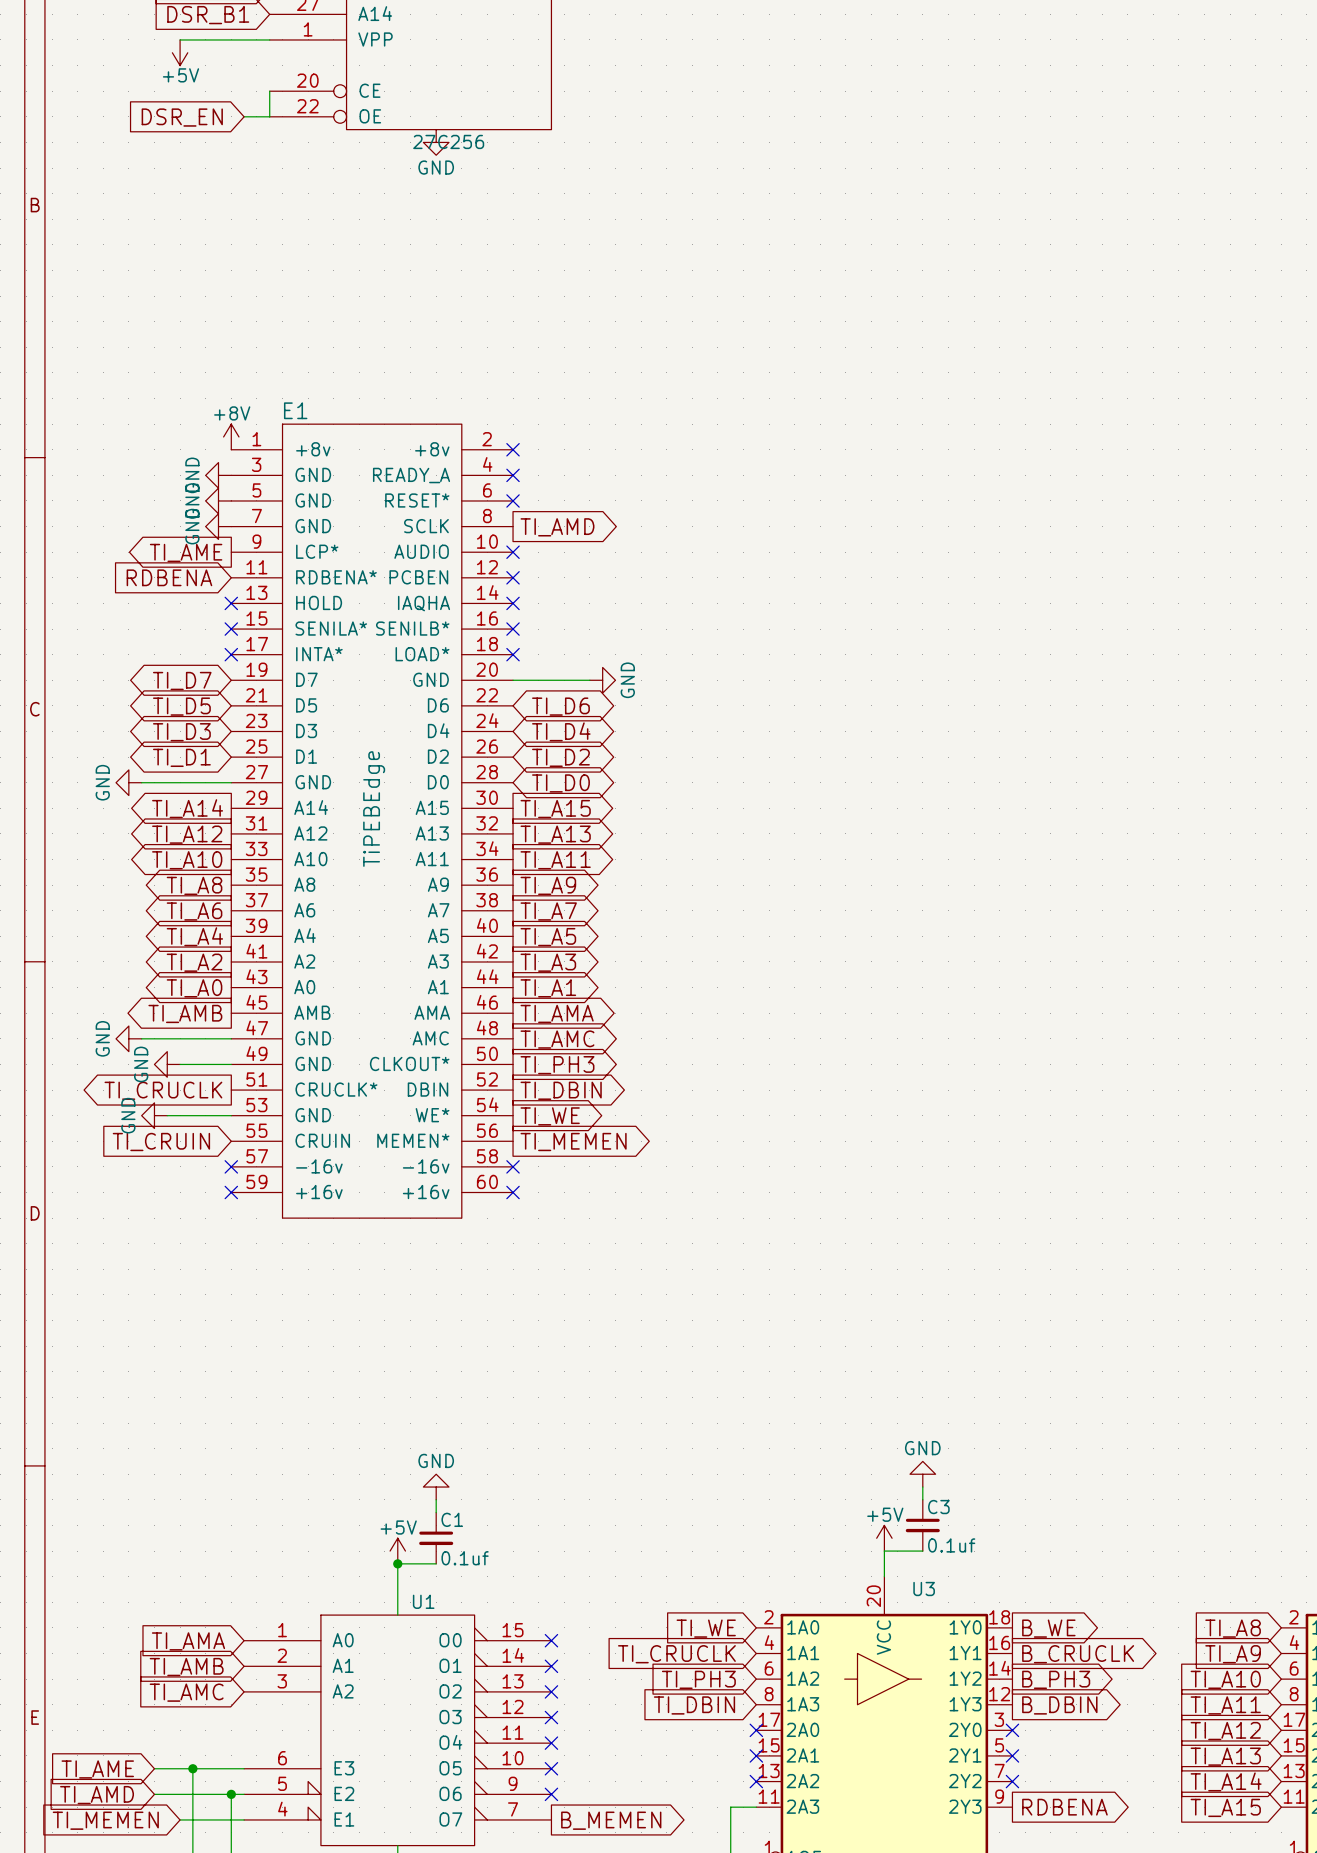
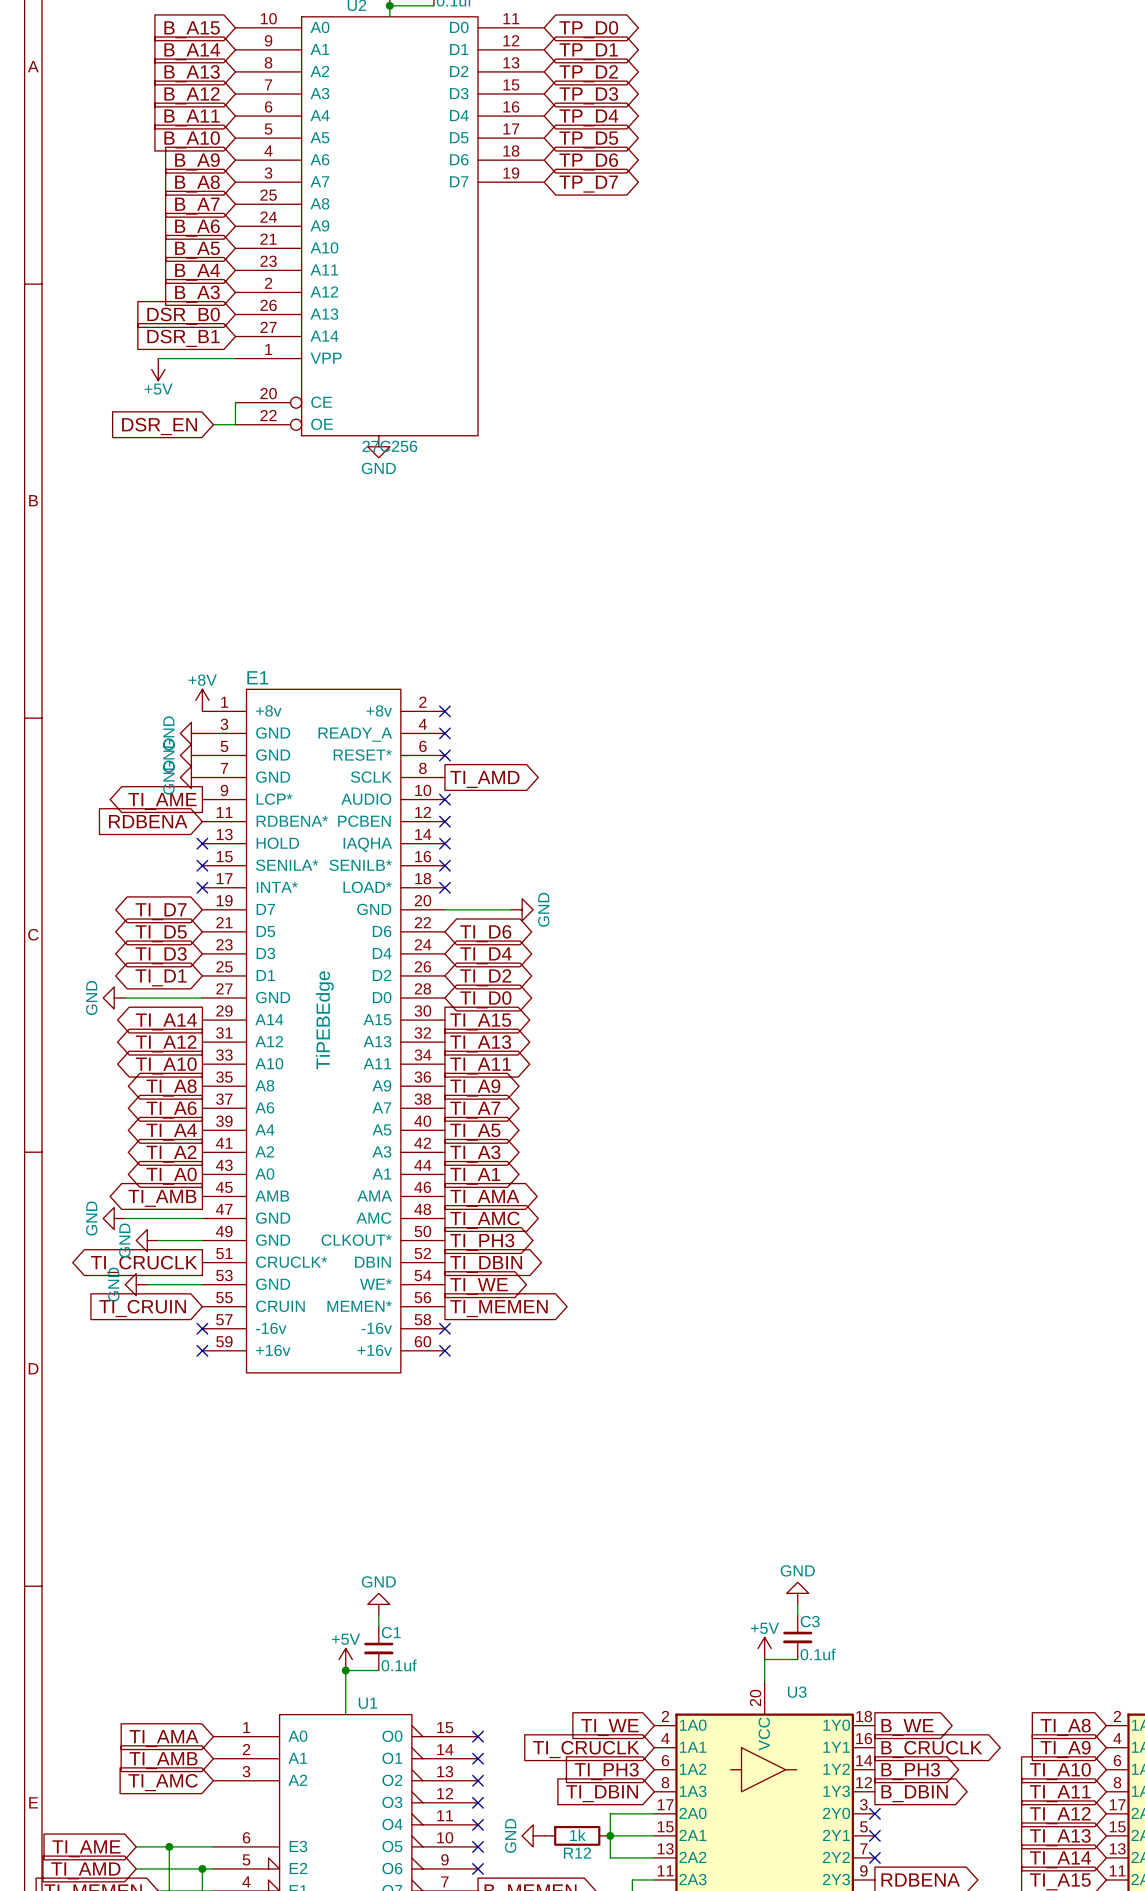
wire: none -> (654, 1813) (610, 1813) (610, 1857) (654, 1857)
no-connect mark: (756, 1730) -> none
power symbol: none -> GND (533, 1835)
R12: none -> 1k (577, 1835)
wire: none -> (610, 1835) (654, 1835)
junction: none -> (610, 1835)
no-connect mark: (756, 1755) -> none
no-connect mark: (756, 1781) -> none

